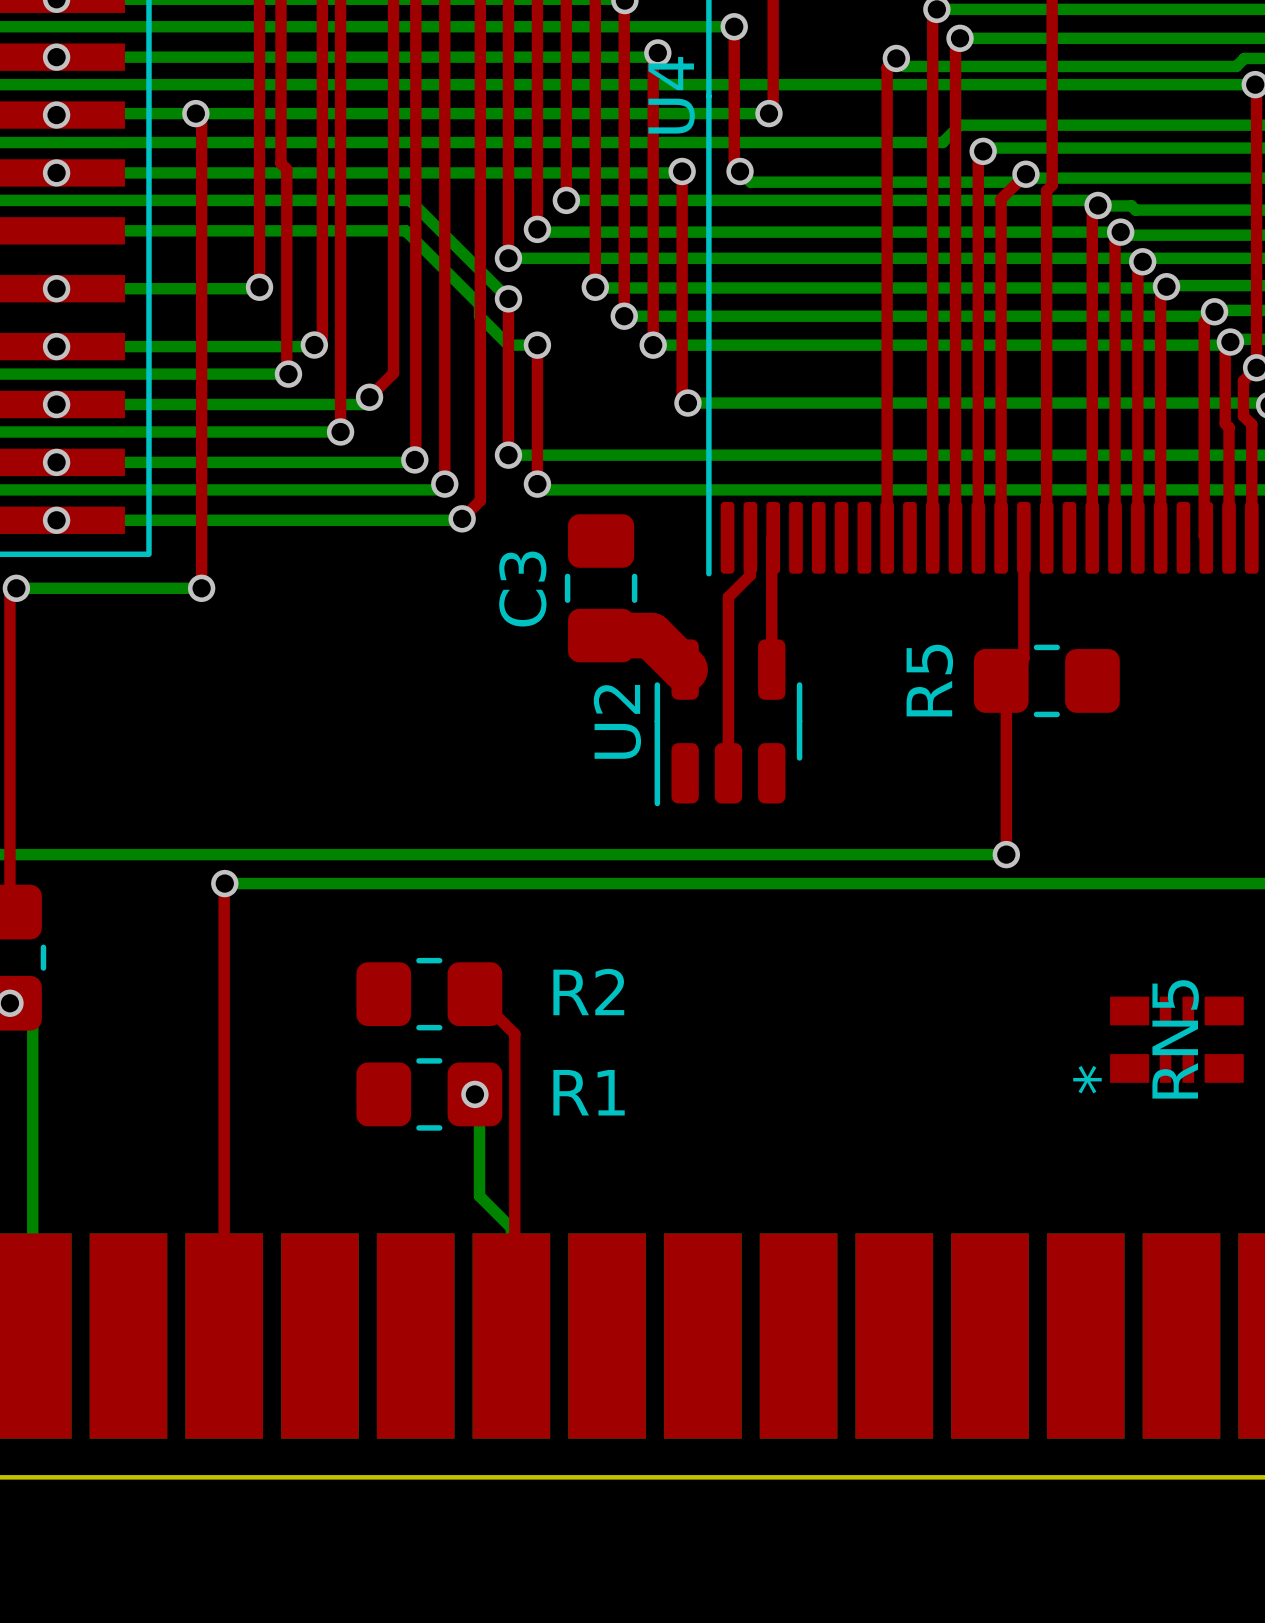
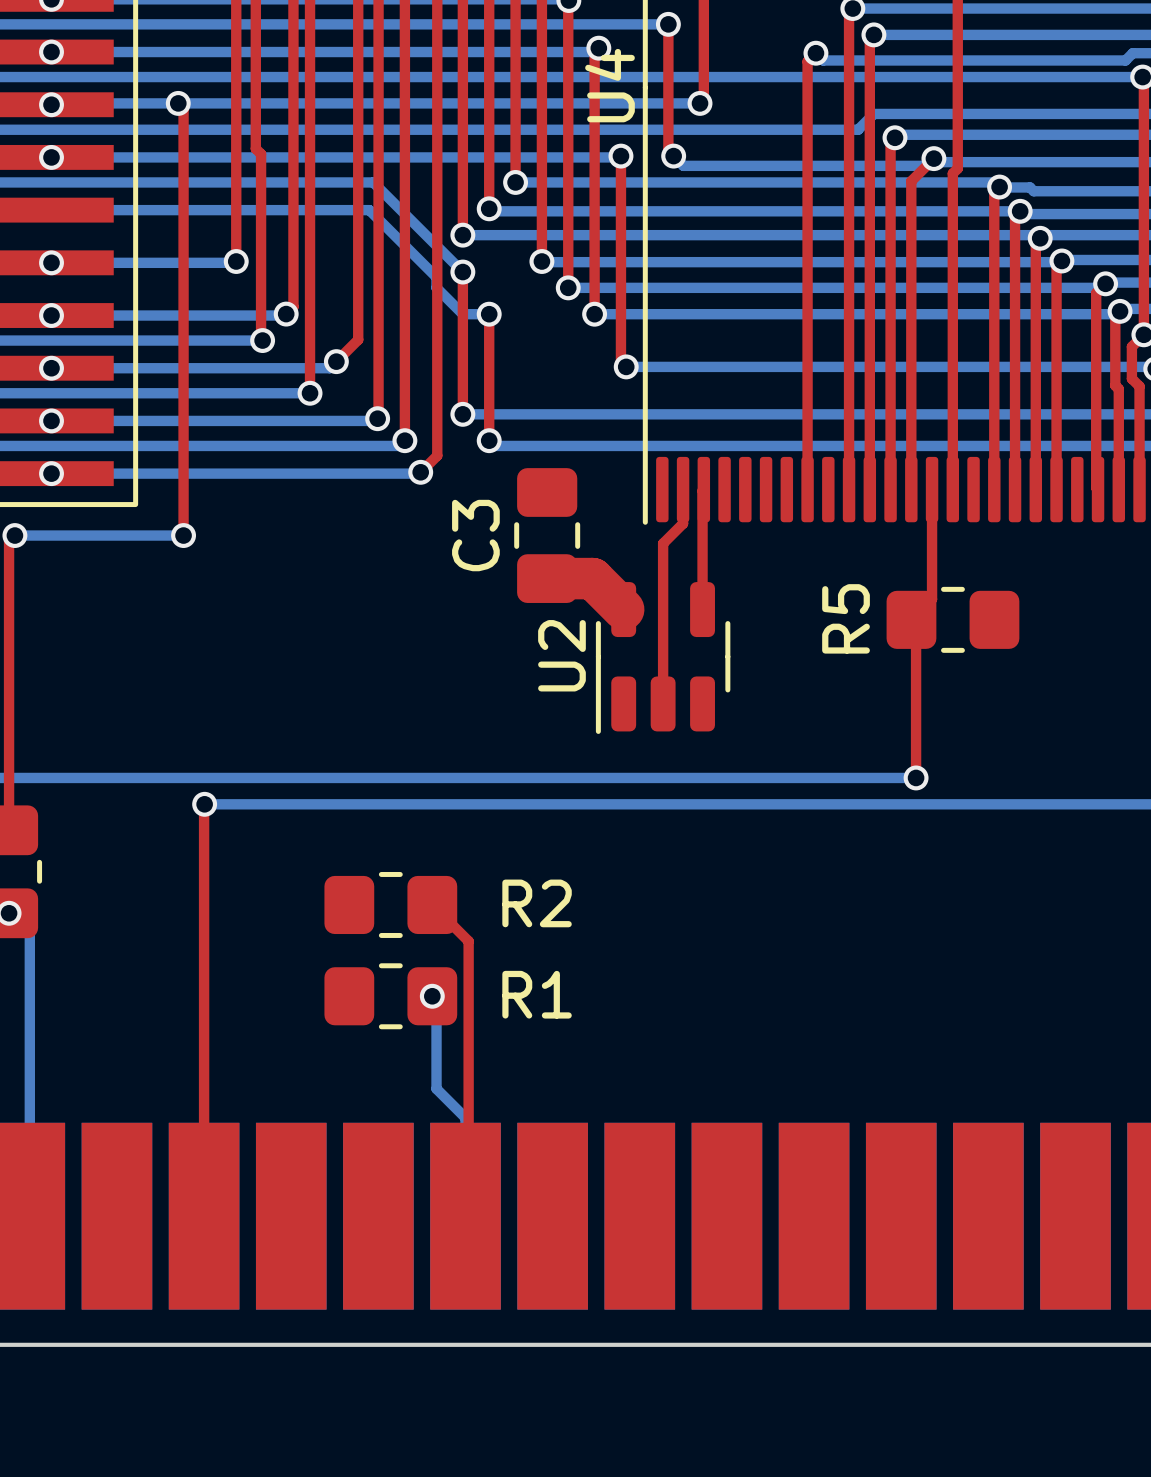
RN5: (1176, 1039) -> none

